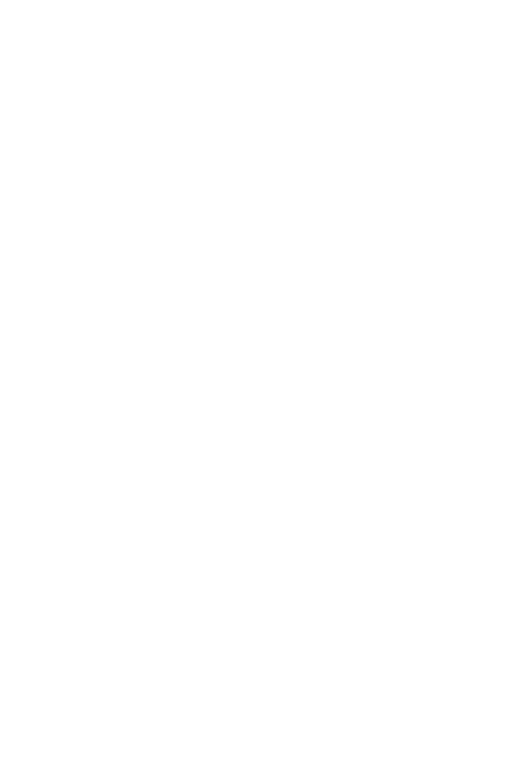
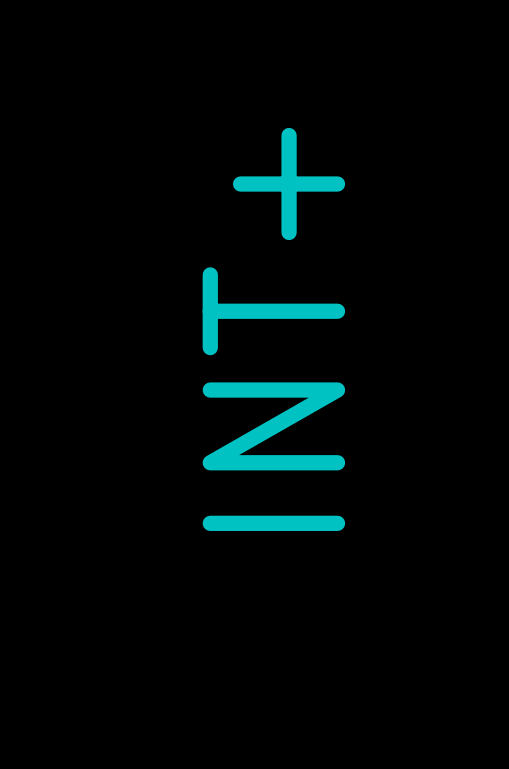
text: none -> INT+ (273, 329)

